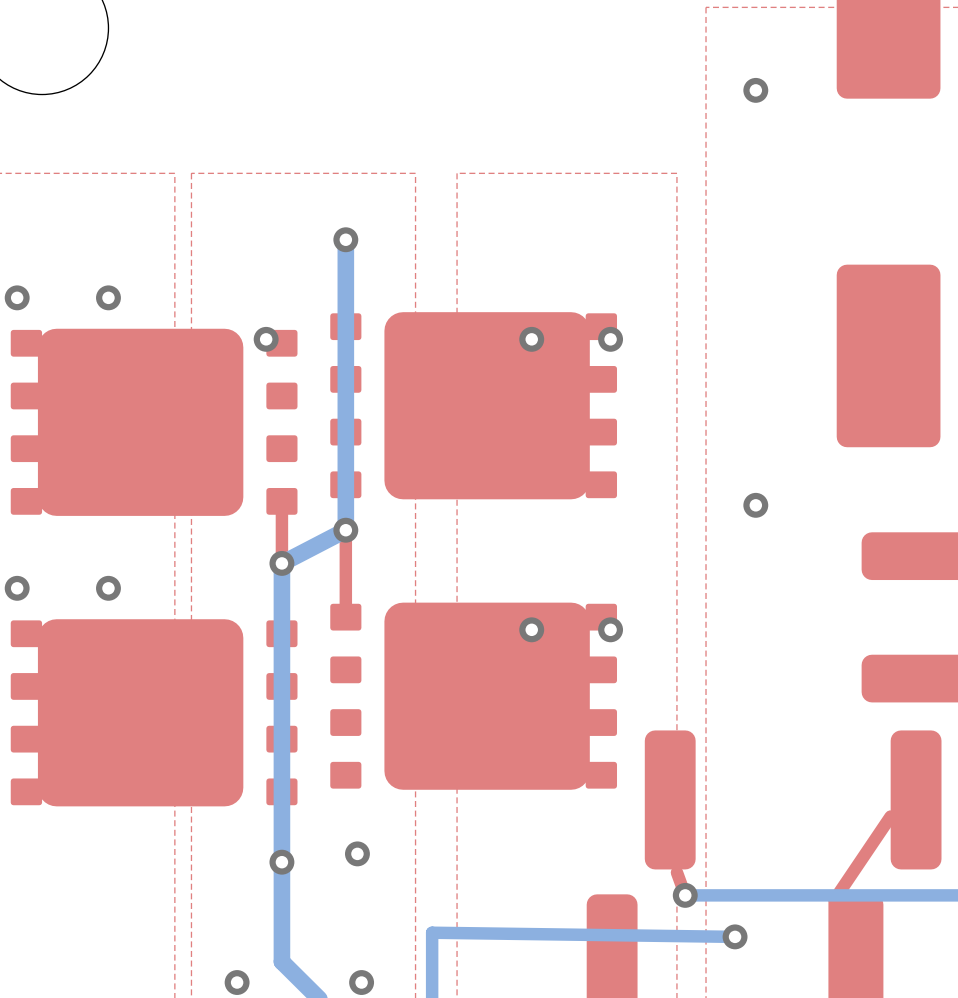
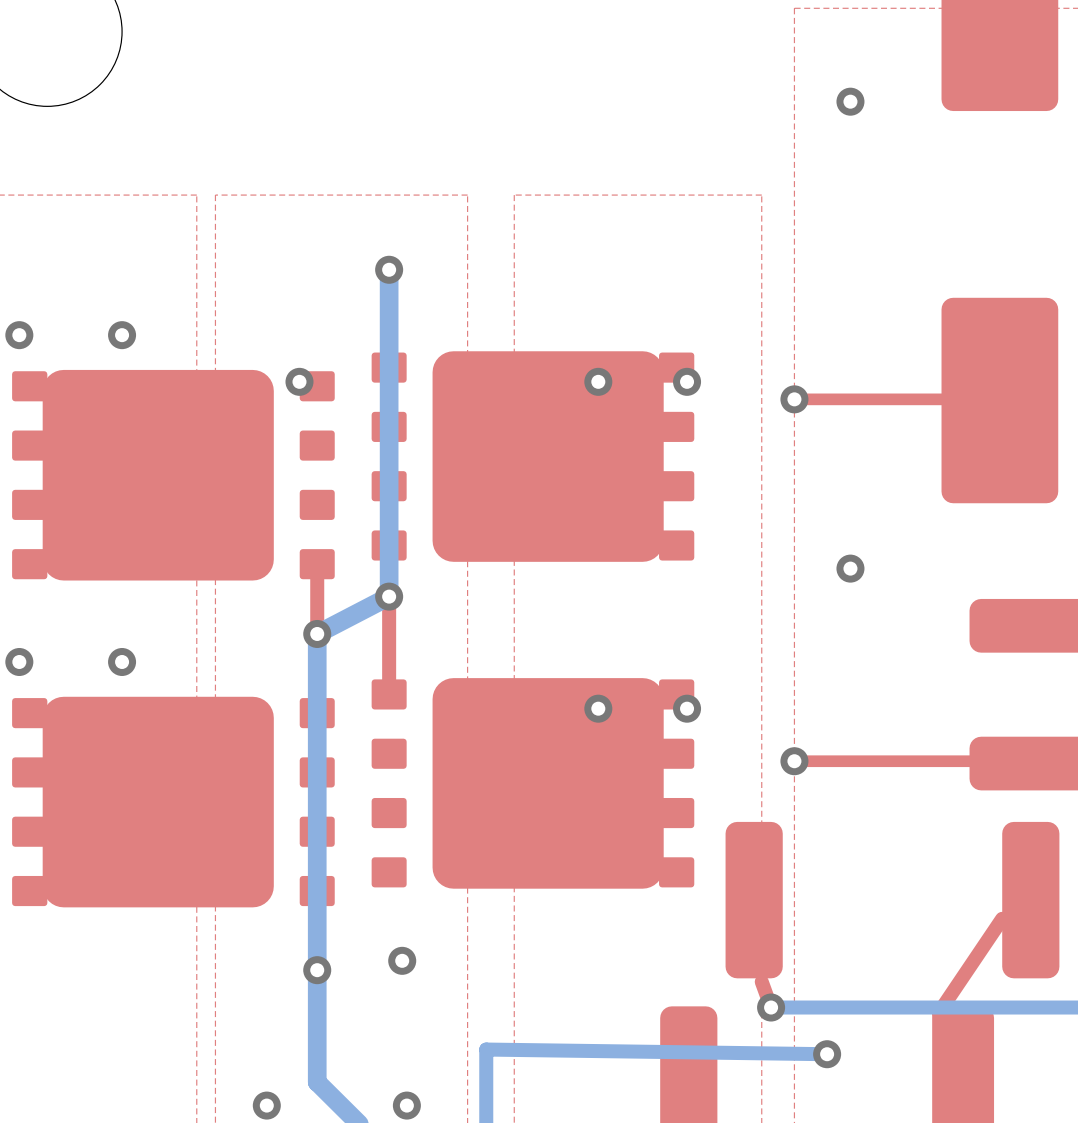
top track: none -> (794, 399) (999, 400)
via: none -> (794, 399)
top track: none -> (794, 761) (975, 761) (1032, 763)
via: none -> (794, 761)

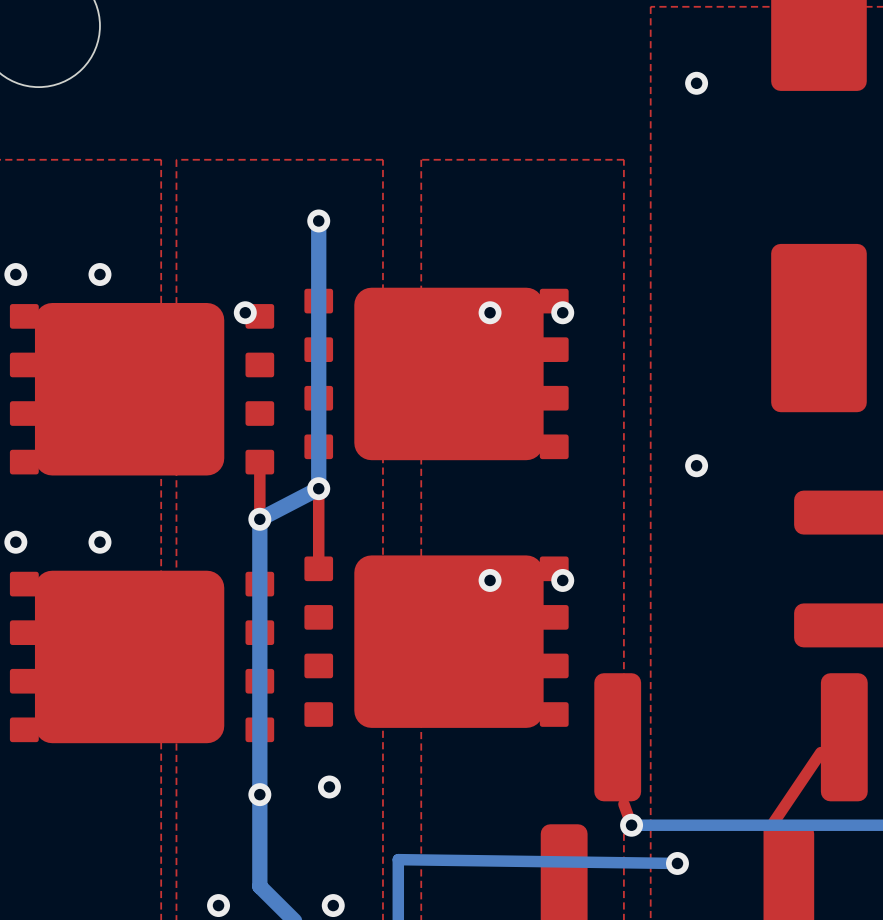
top track: (794, 399) (999, 400) -> none
via: (794, 399) -> none
top track: (794, 761) (975, 761) (1032, 763) -> none
via: (794, 761) -> none

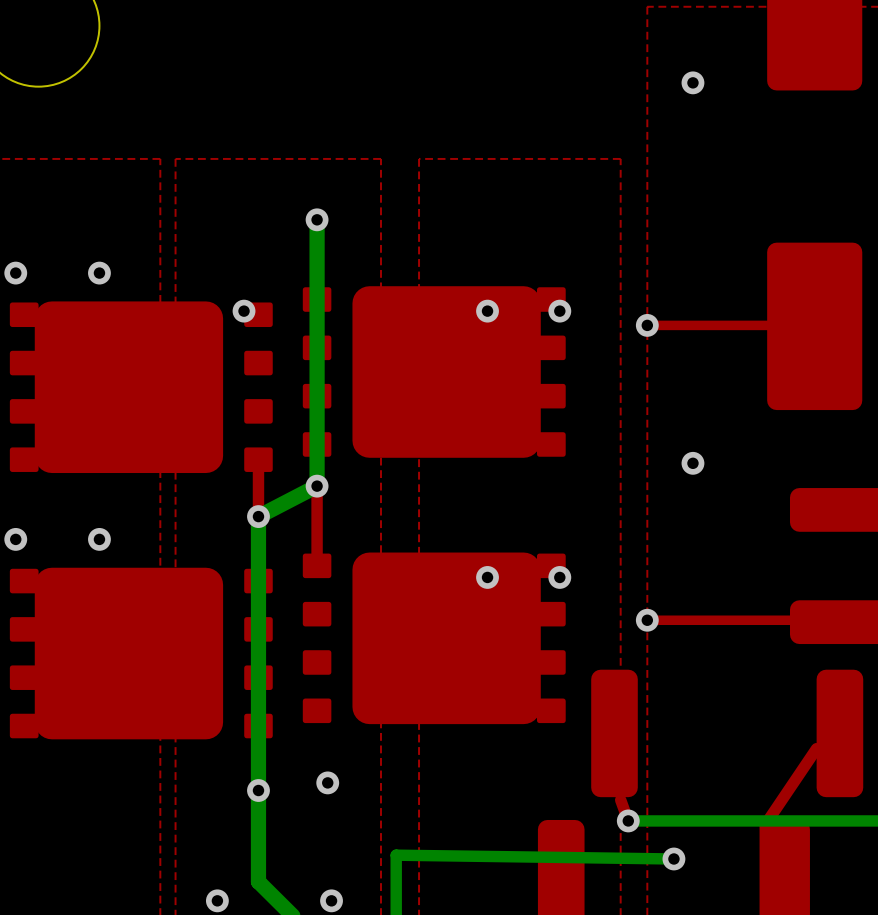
top track: none -> (647, 325) (814, 326)
via: none -> (647, 325)
top track: none -> (647, 620) (841, 622)
via: none -> (647, 620)

